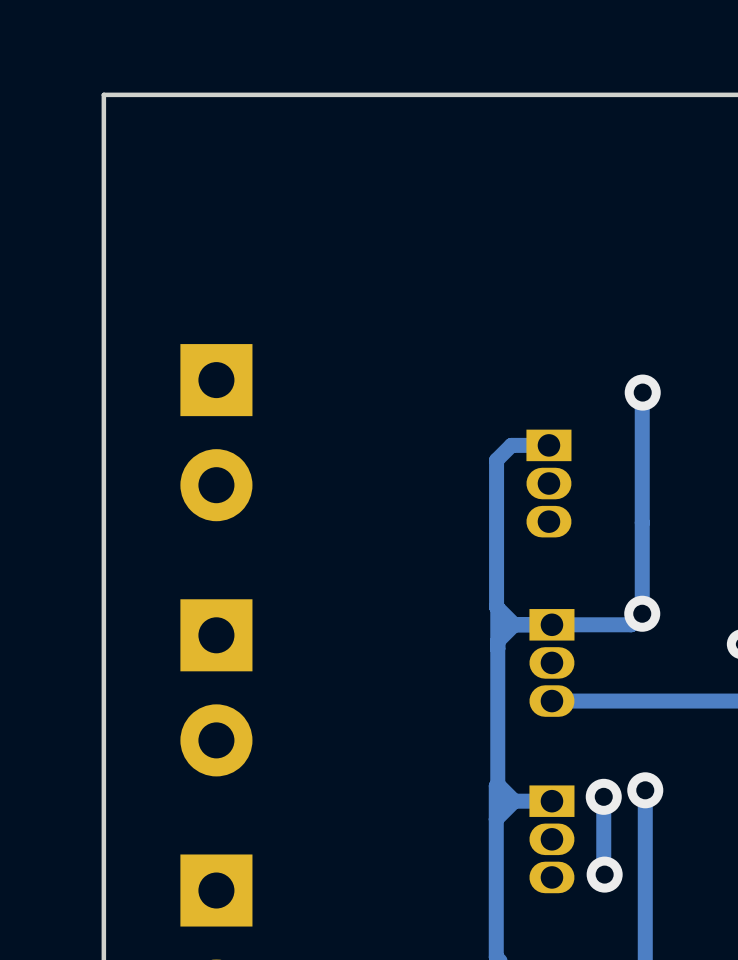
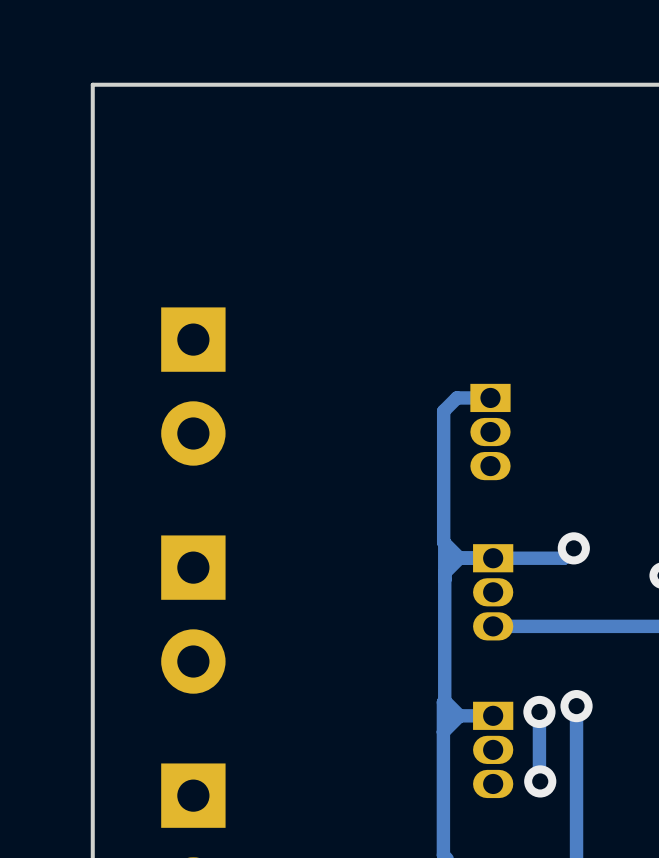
track: (642, 392) (642, 613) -> none
via: (642, 392) -> none

